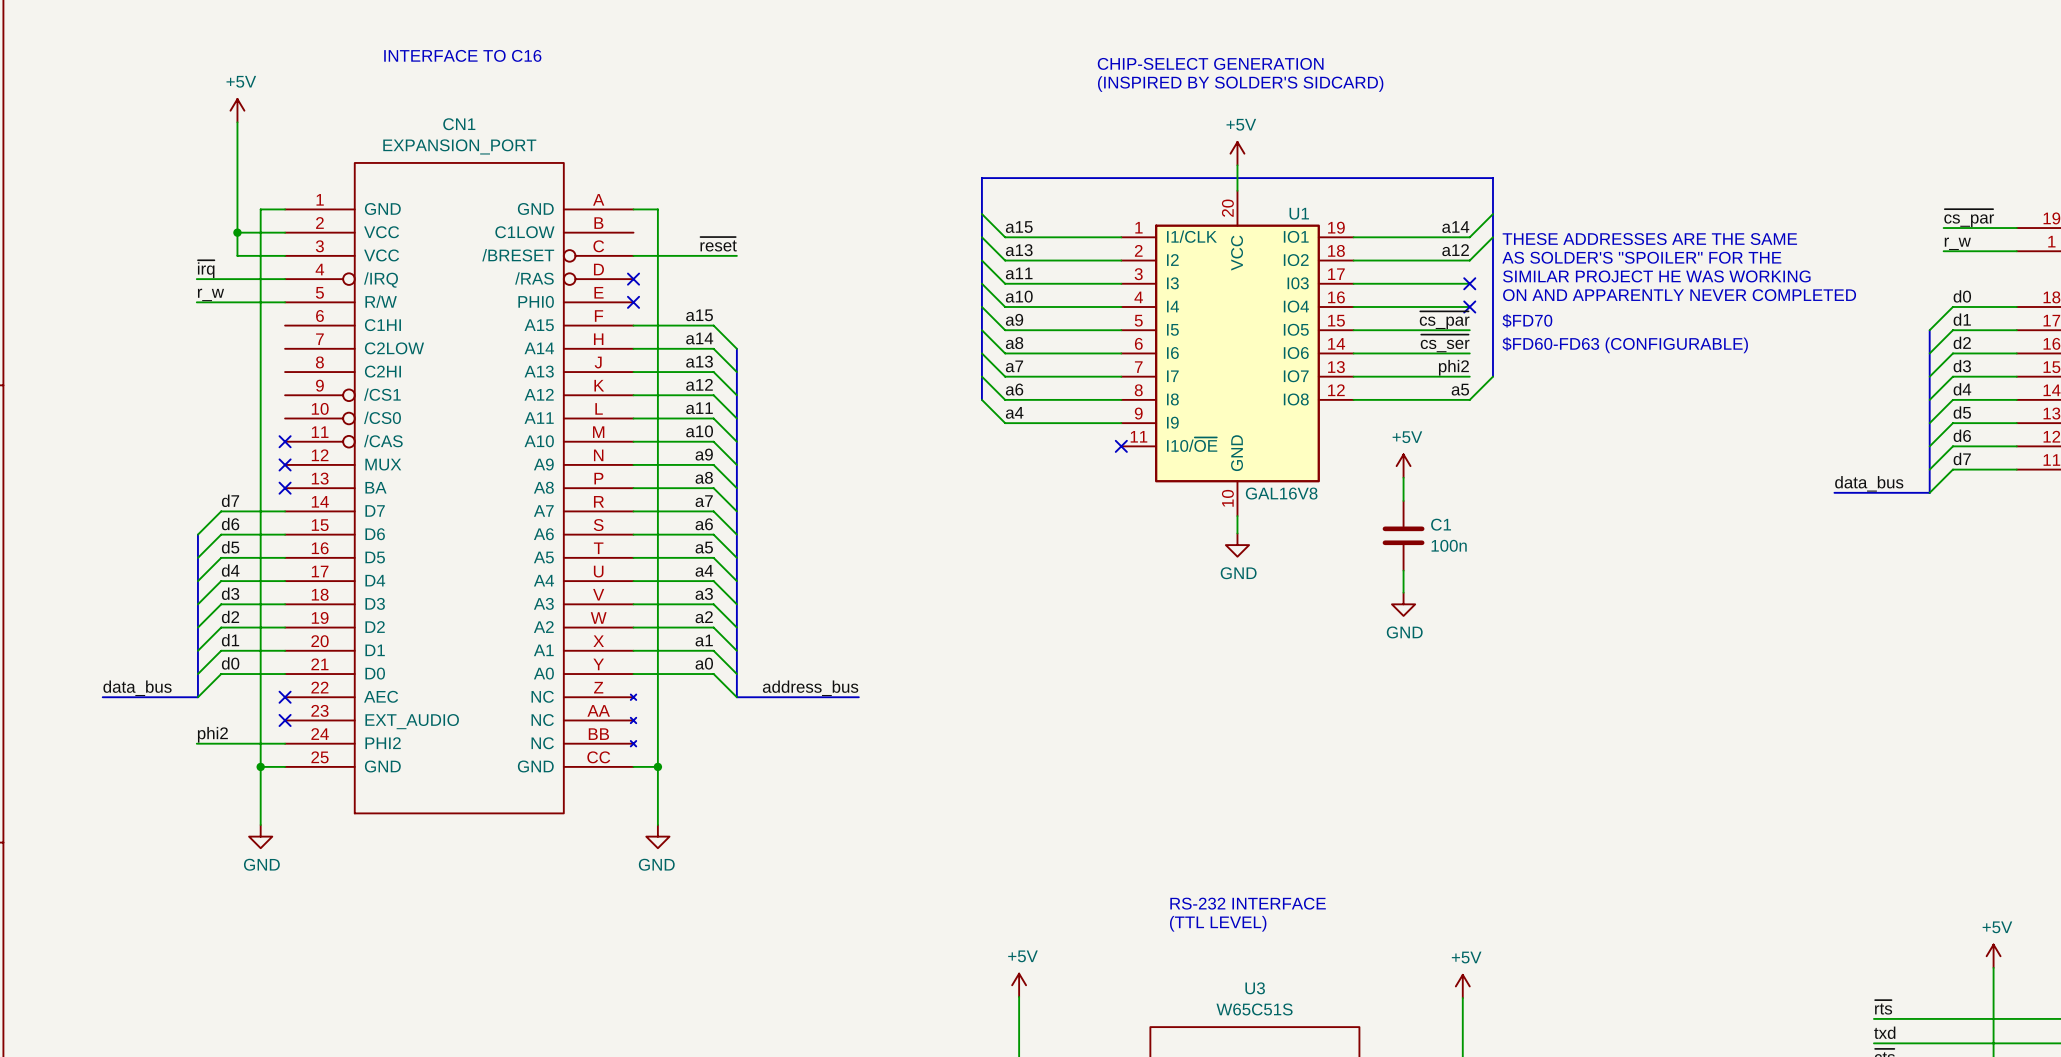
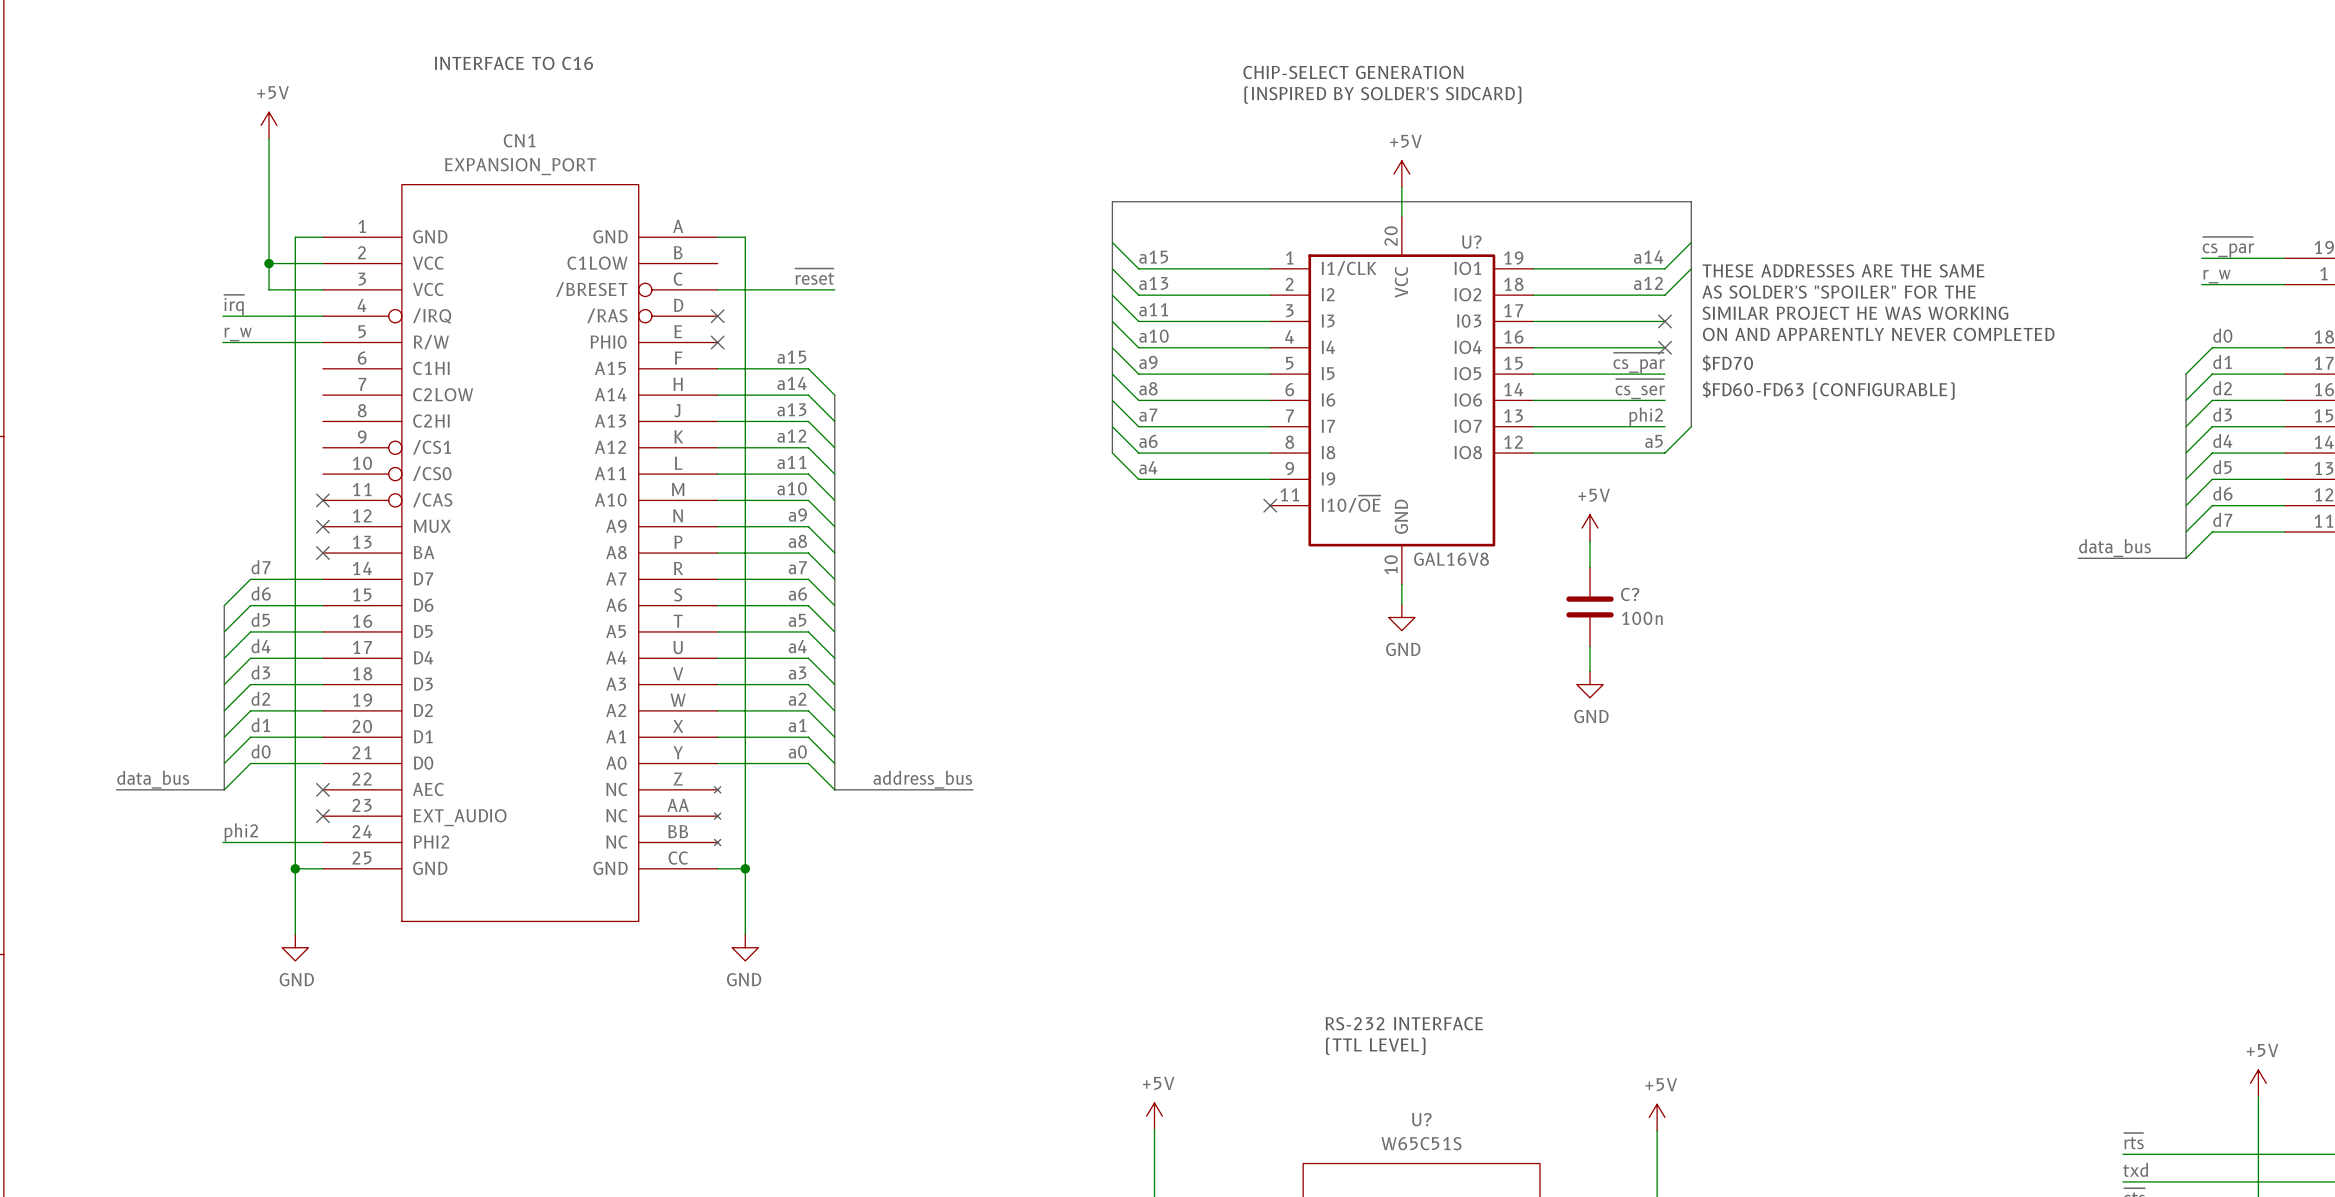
U1 name: U1 (1299, 213) -> U? (1471, 242)
C1 name: C1 (1441, 524) -> C? (1630, 594)
U3 name: U3 (1255, 988) -> U? (1421, 1119)

